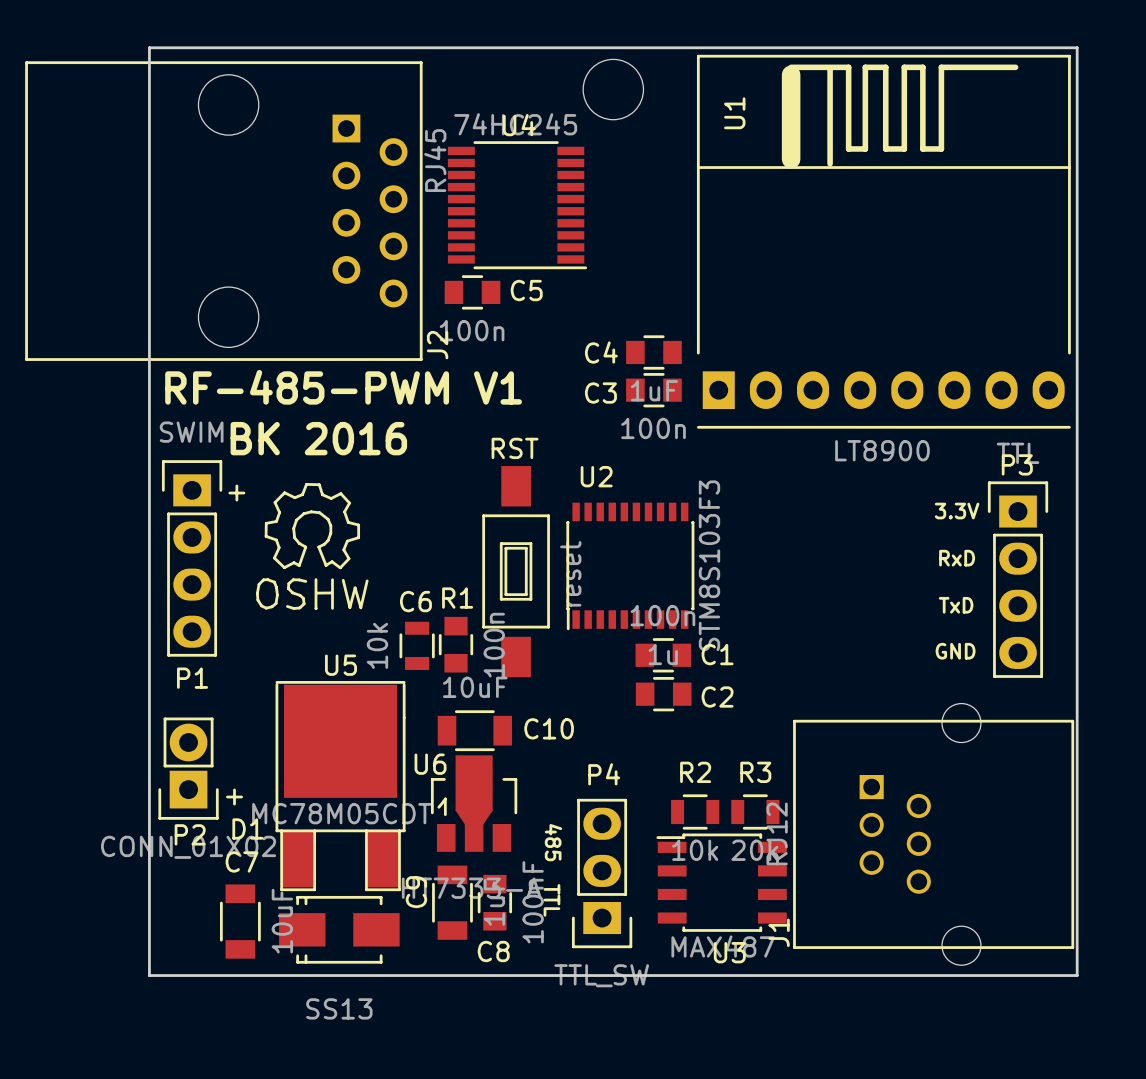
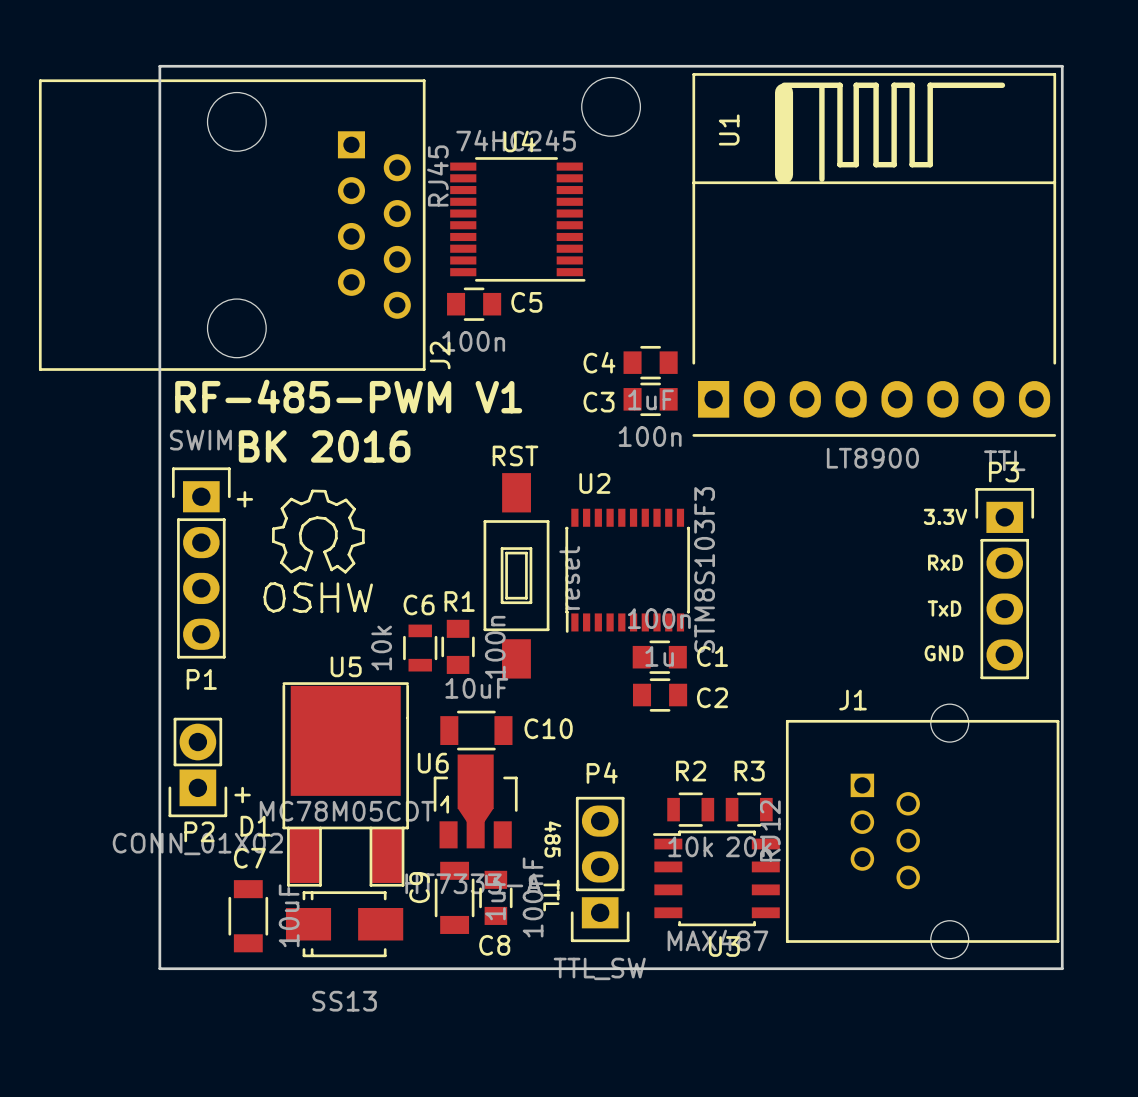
J1 name rotation: 0° (779, 932) -> 90° clockwise (853, 700)
J1 name position: J1 (779, 932) -> J1 (853, 700)

